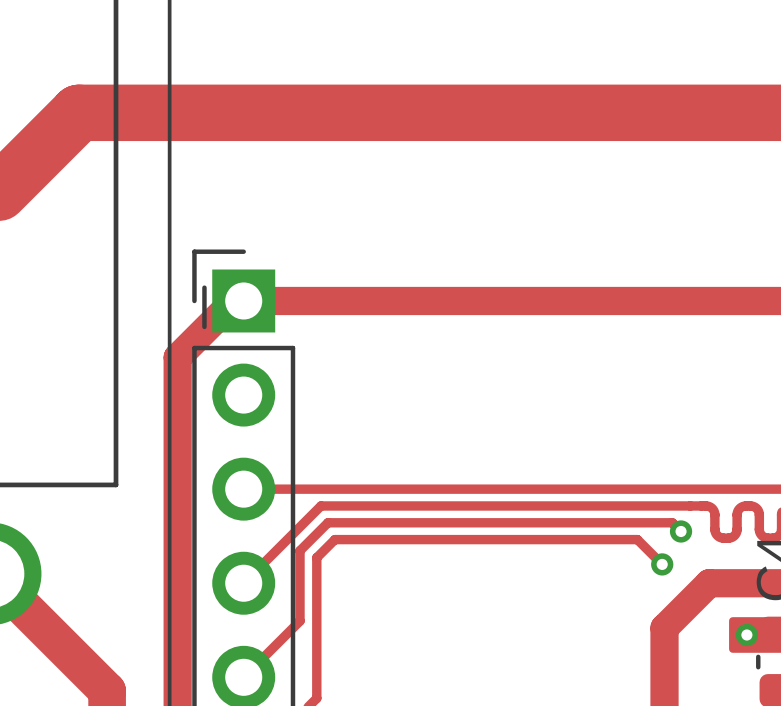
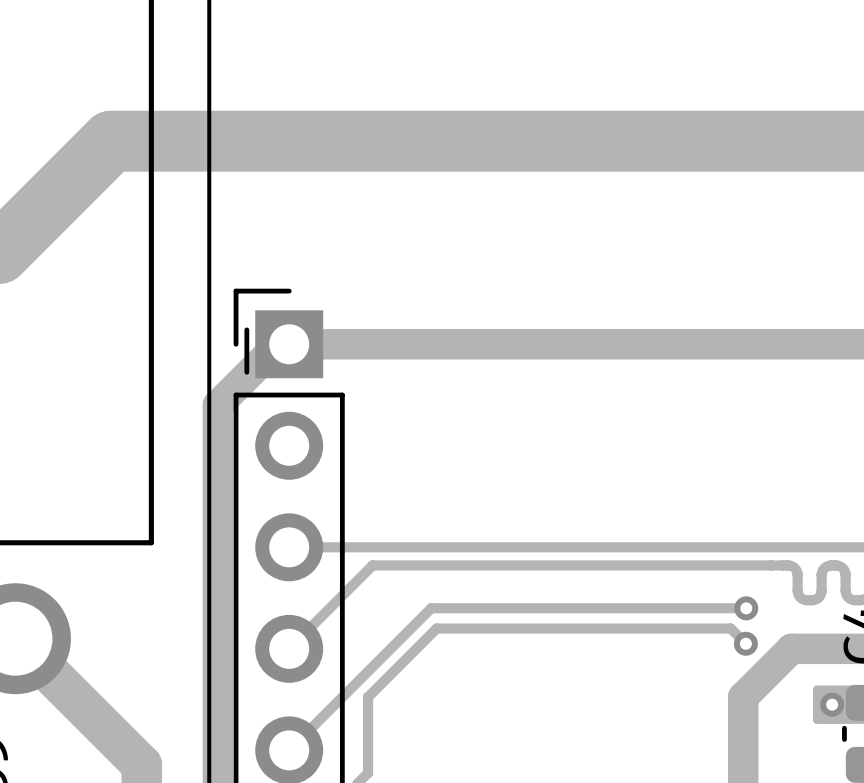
track: (681, 531) (672, 522) (327, 522) (299, 550) (299, 621) -> (746, 608) (431, 608) (349, 689)
via: (681, 531) -> none
via: none -> (746, 608)
track: (662, 564) (637, 539) (334, 539) (316, 557) (316, 628) -> (745, 643) (730, 628) (436, 628) (368, 697)
via: (662, 564) -> none
via: none -> (745, 643)

